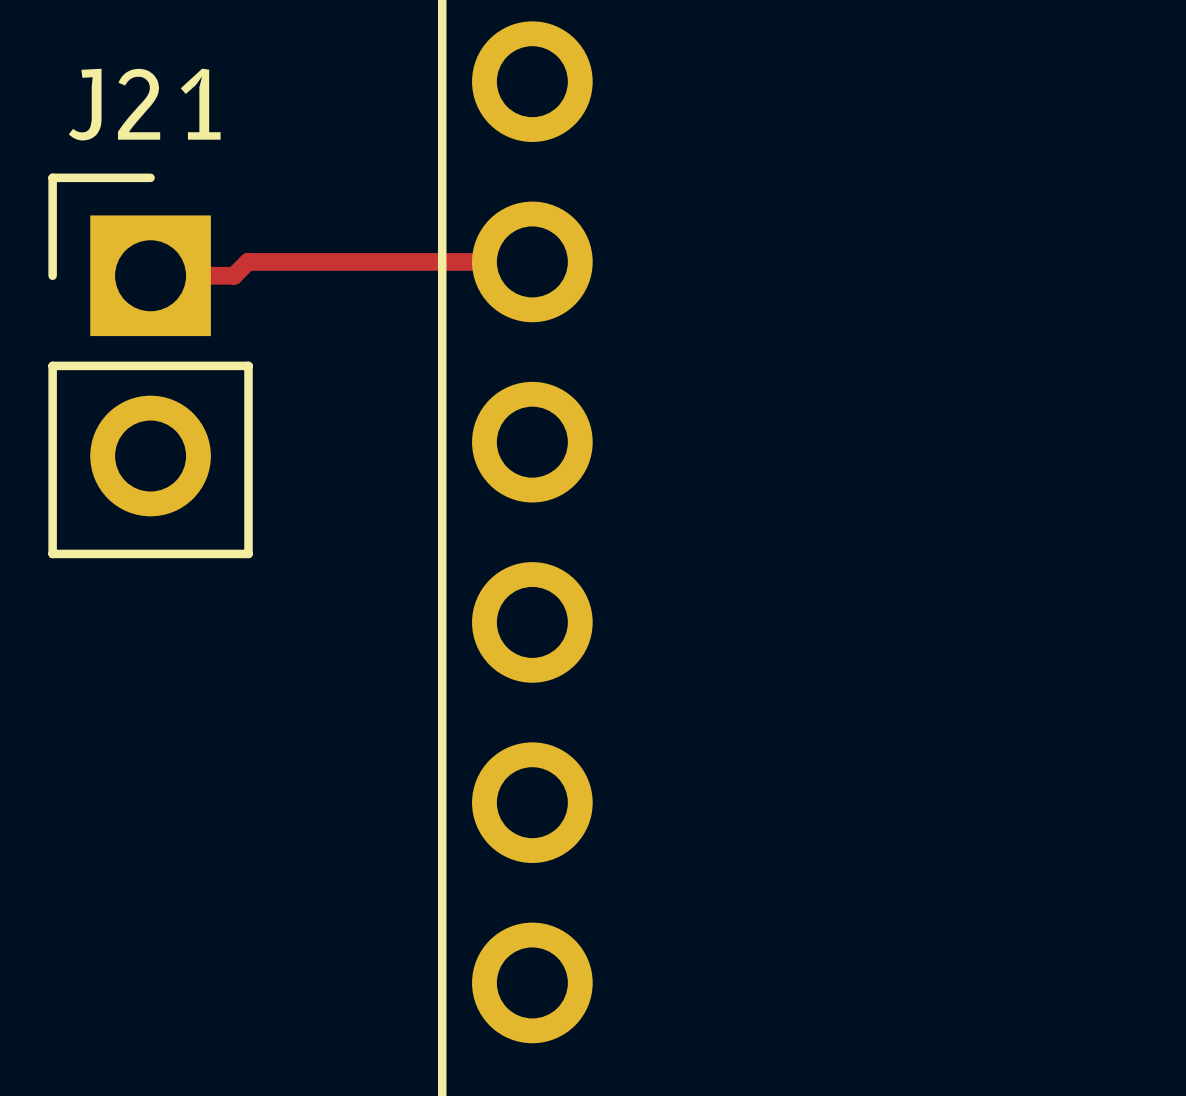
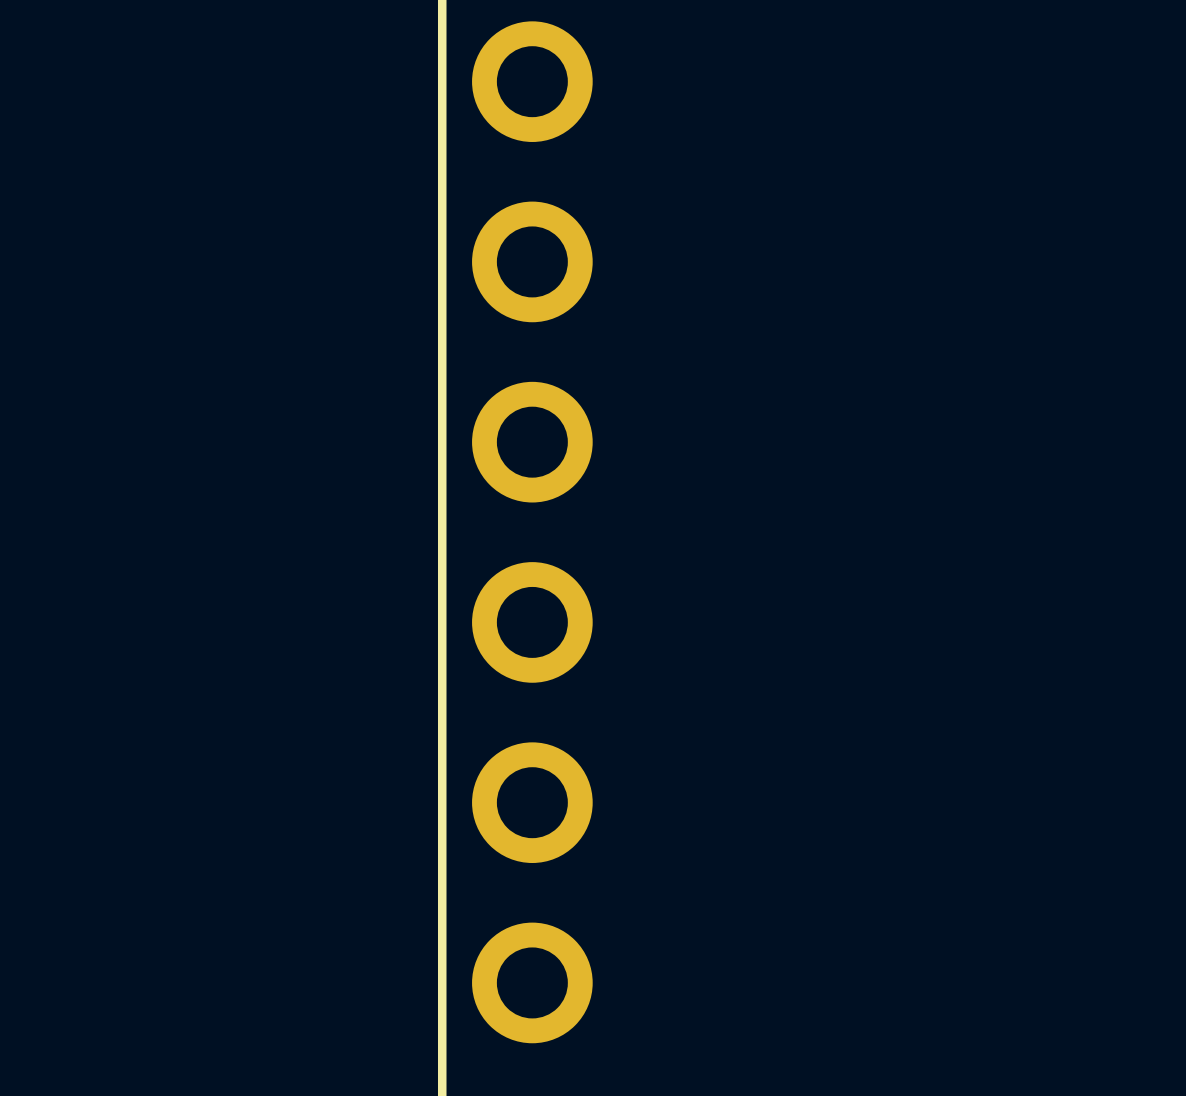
track: (532, 261) (247, 261) (234, 275) (150, 275) -> none
J21: (150, 365) -> none

